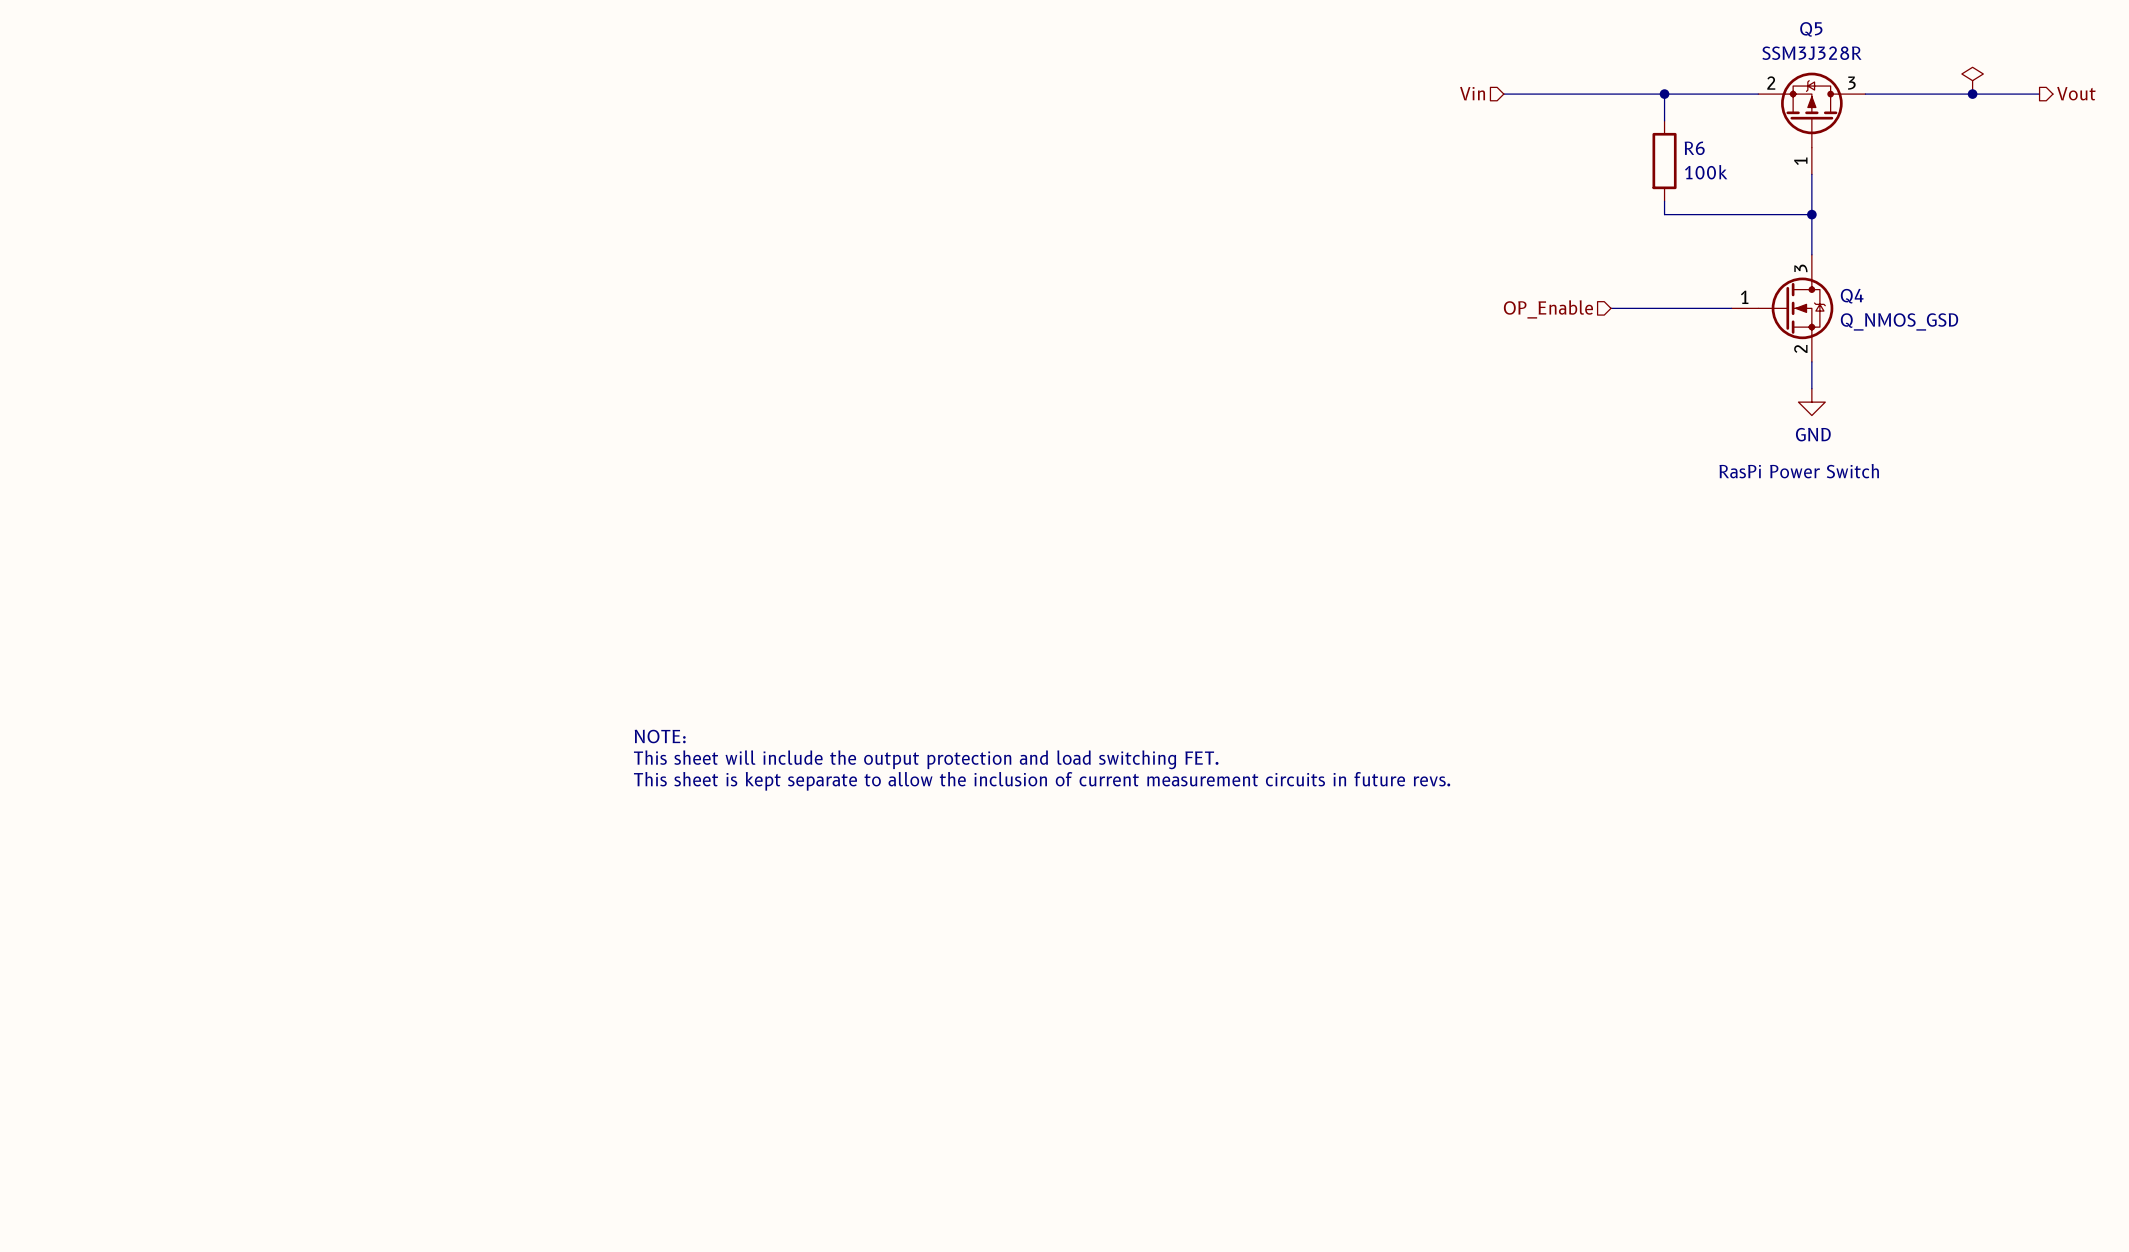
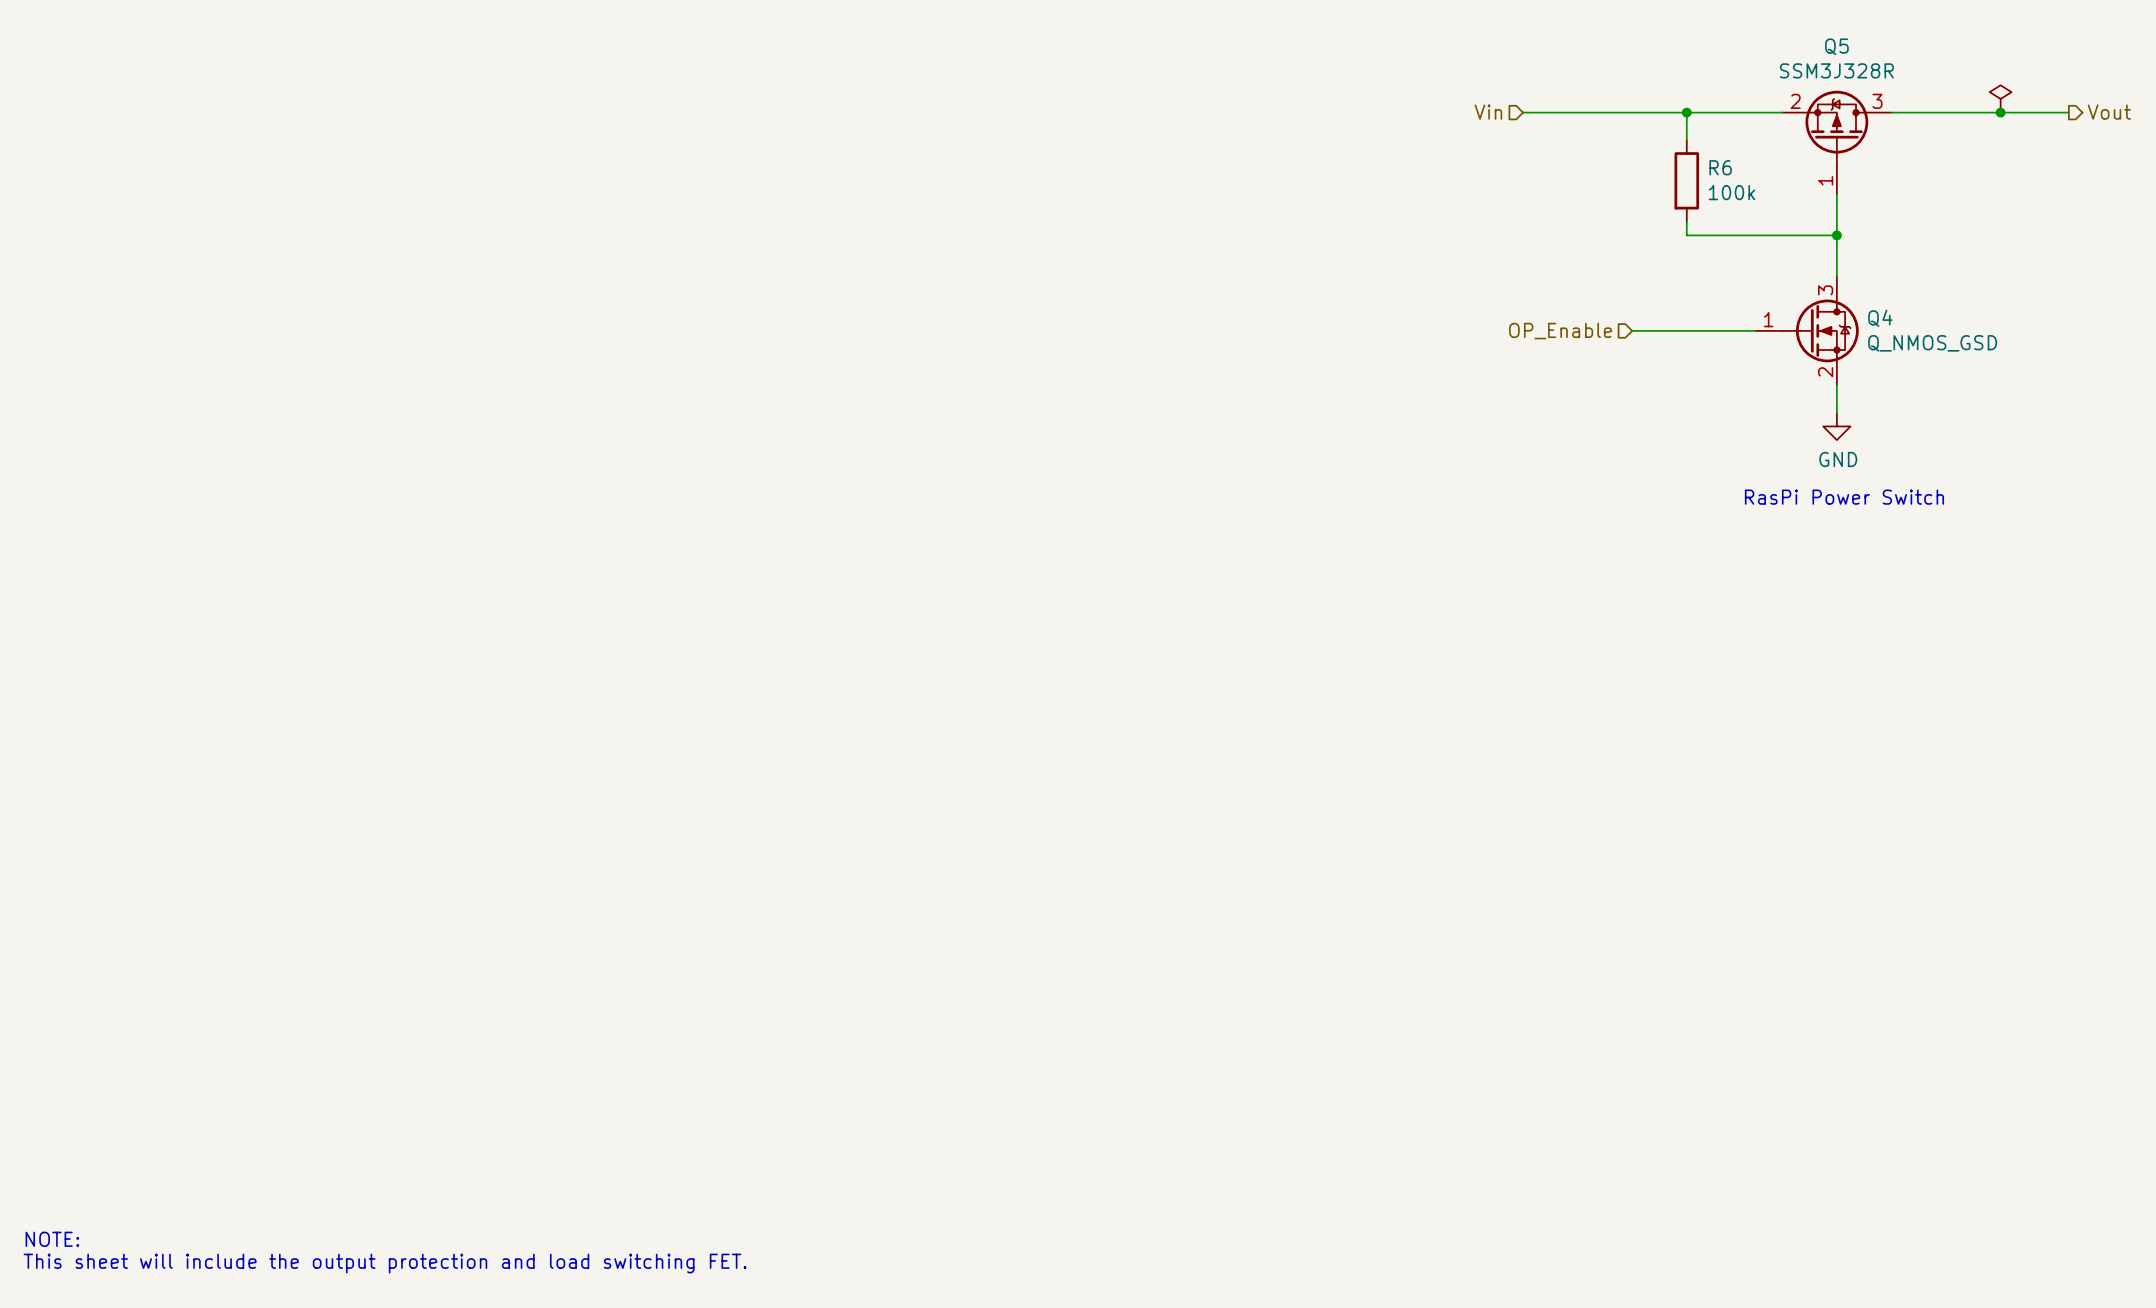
text: NOTE: (660, 736) -> none
text: This sheet will include the output protection and load switching FET. (926, 759) -> none
text: This sheet is kept separate to allow the inclusion of current measurement circuits in future revs. (1042, 781) -> none
text: none -> NOTE: (52, 1239)
text: none -> This sheet will include the output protection and load switching FET. (385, 1263)

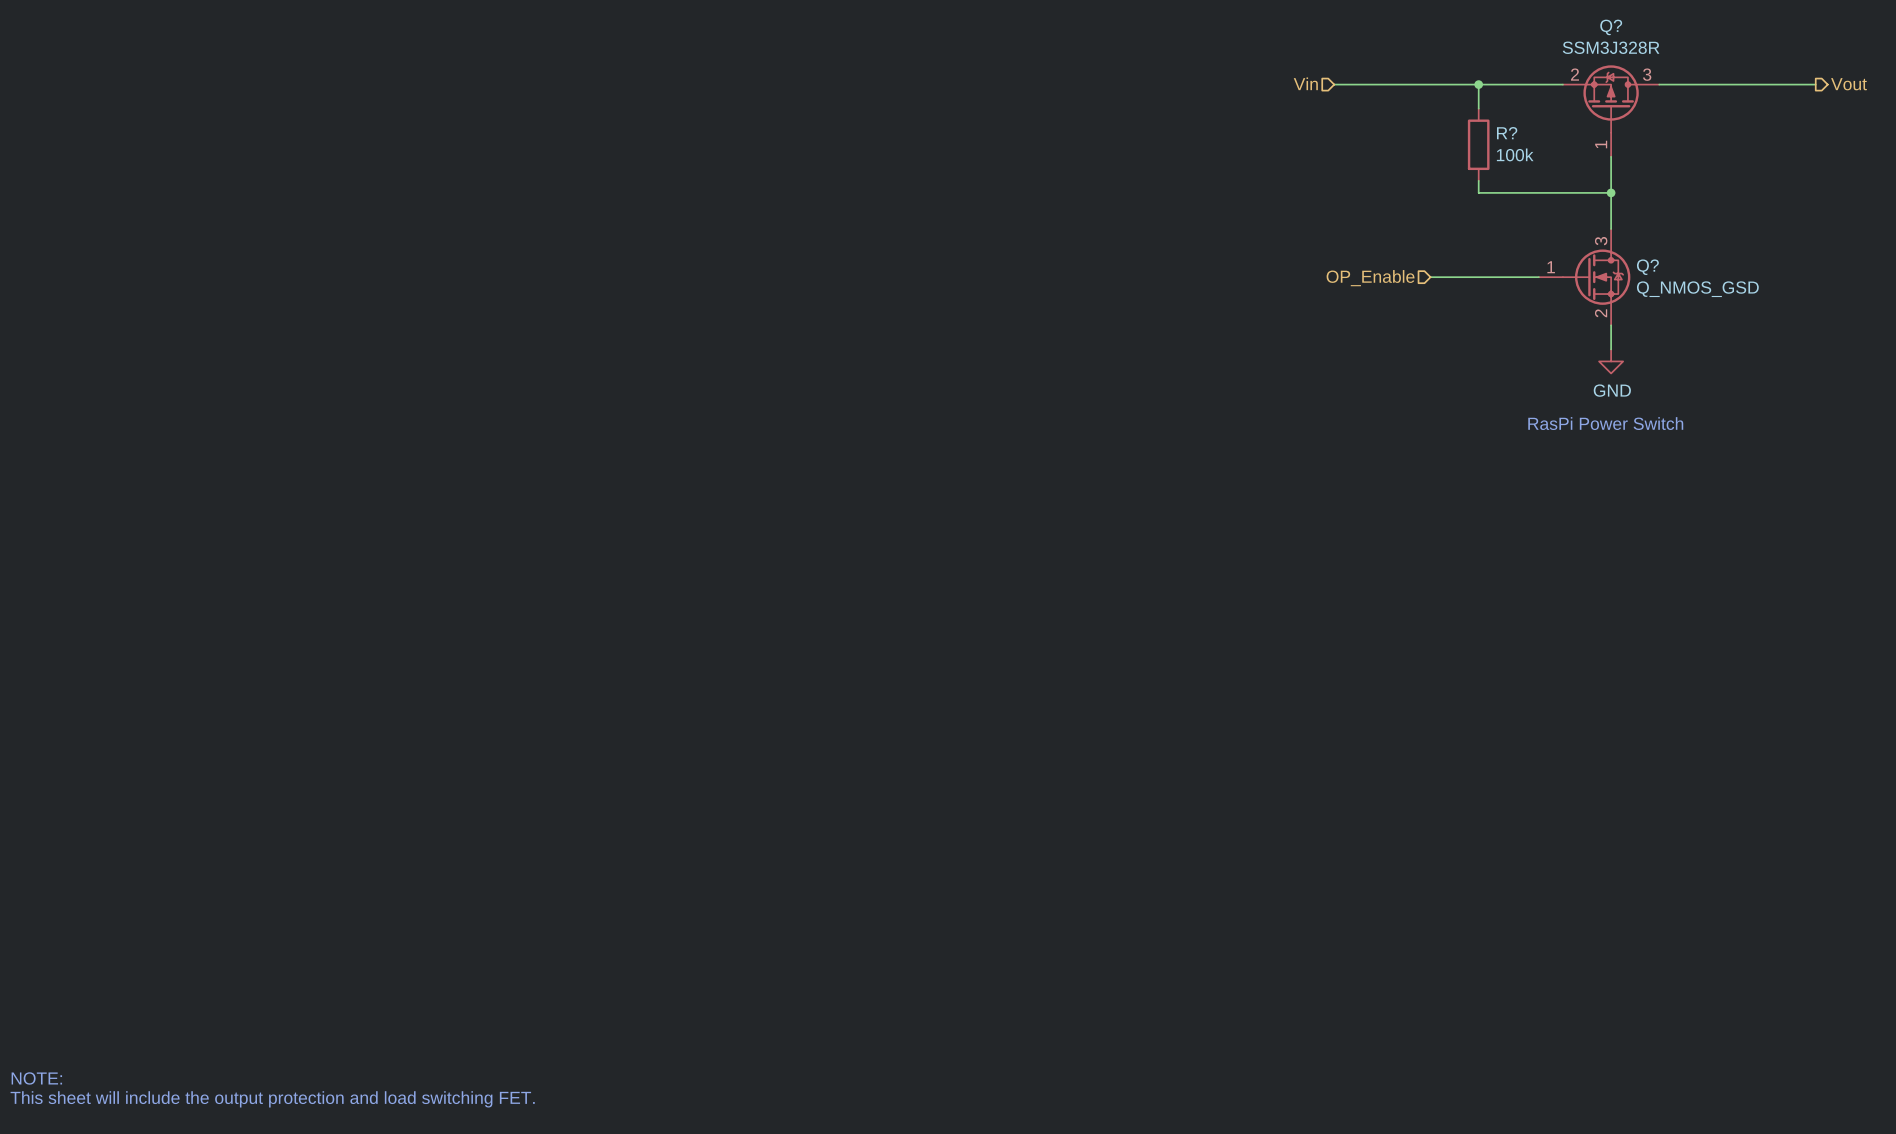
Q5 name: Q5 (1836, 46) -> Q? (1611, 27)
power symbol: (2000, 98) -> none
junction: (2000, 112) -> none
R6 name: R6 (1720, 167) -> R? (1507, 133)
Q4 name: Q4 (1880, 318) -> Q? (1647, 267)

